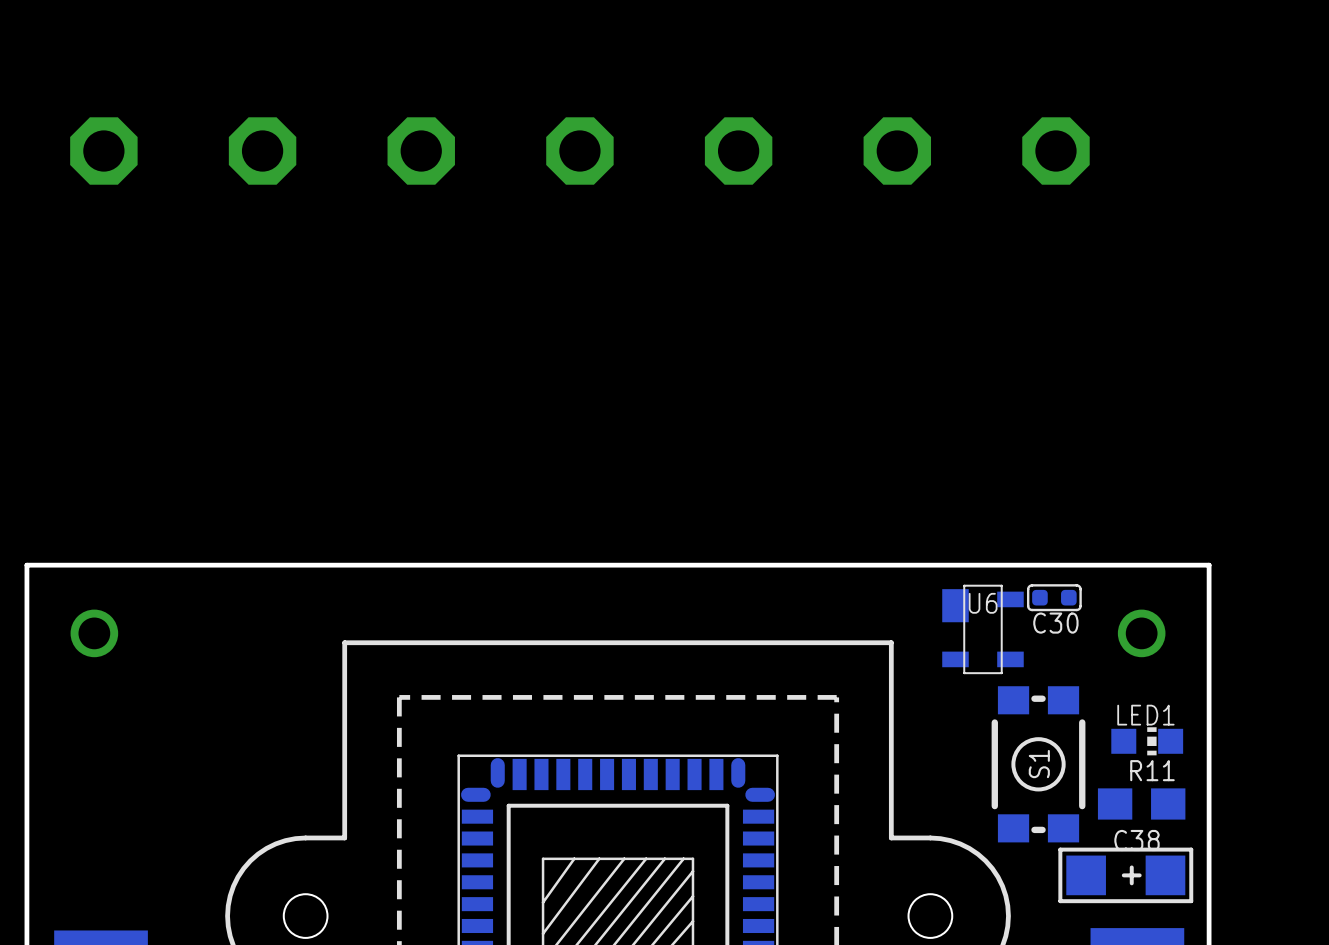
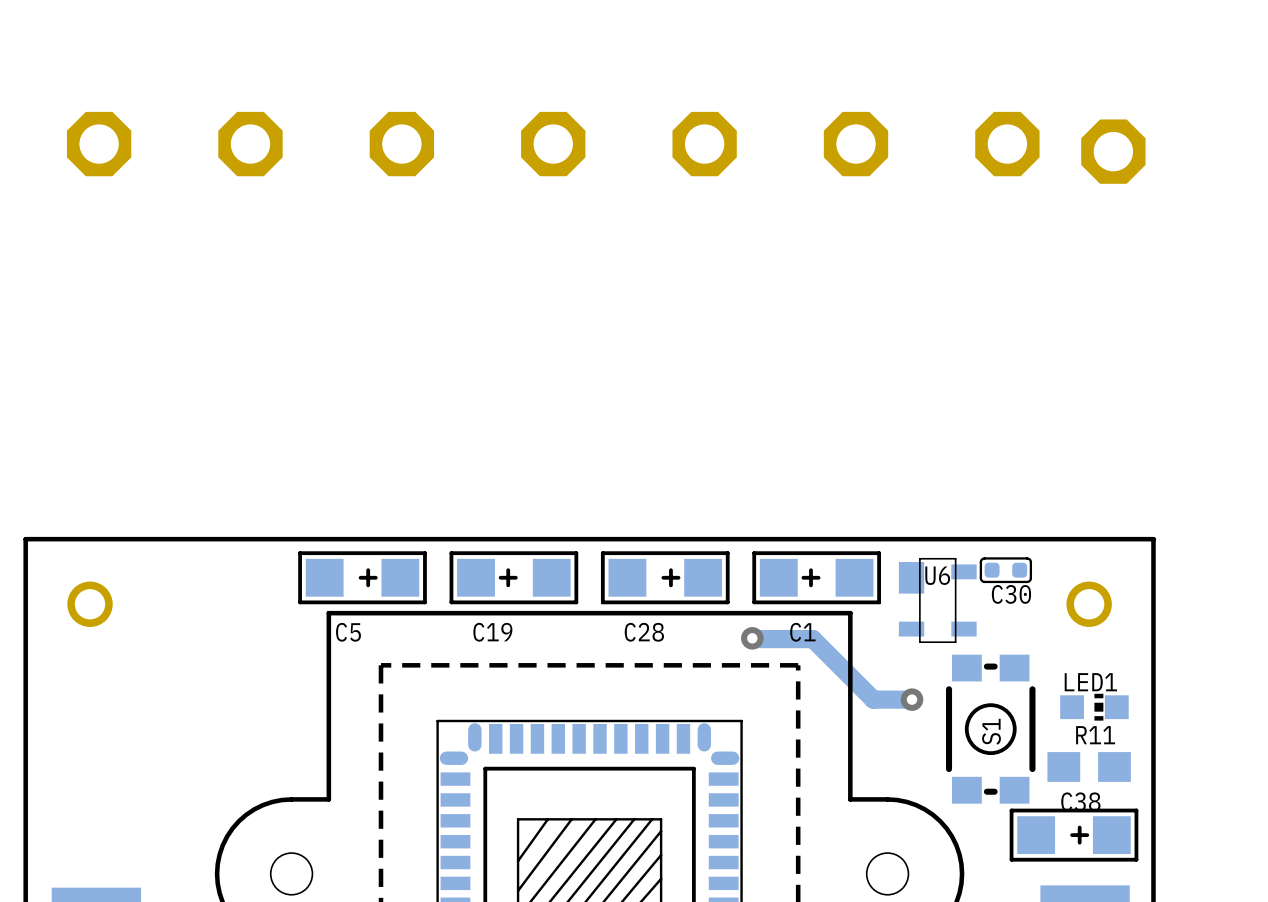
part: none -> (1113, 151)
C5: none -> (362, 577)
C19: none -> (513, 577)
C28: none -> (665, 577)
C1: none -> (816, 577)
track: none -> (752, 638) (812, 639) (873, 699) (912, 699)
via: none -> (752, 638)
via: none -> (912, 699)

